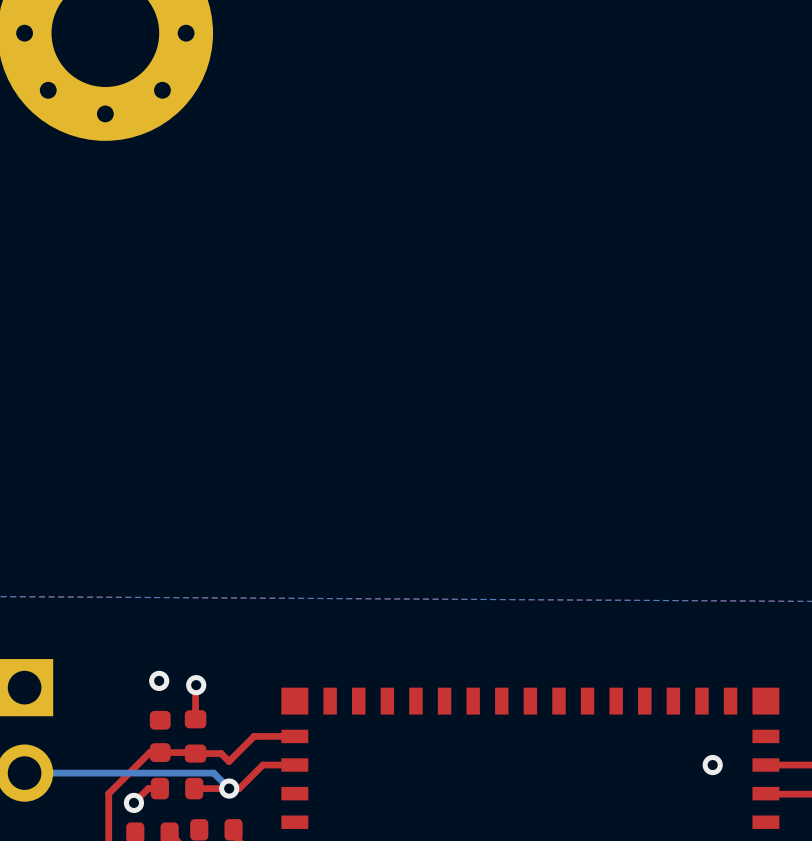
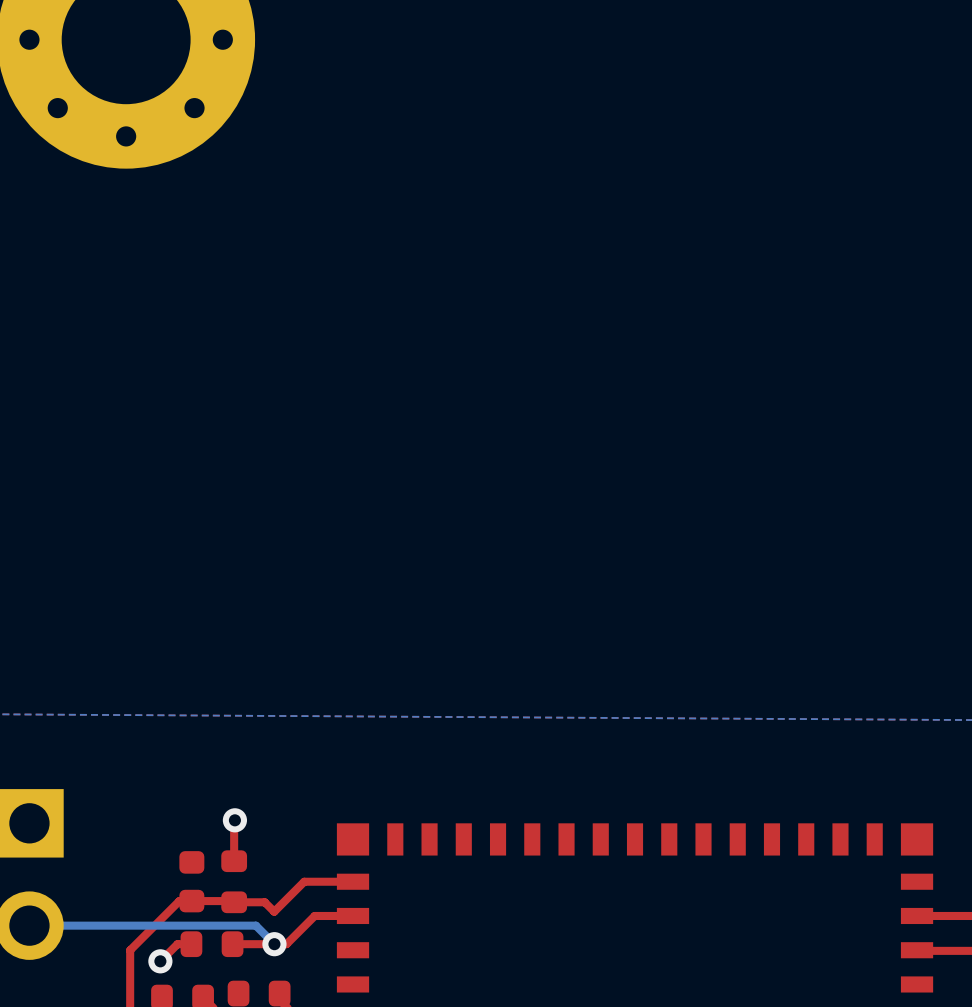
via: (159, 680) -> none
via: (712, 765) -> none

